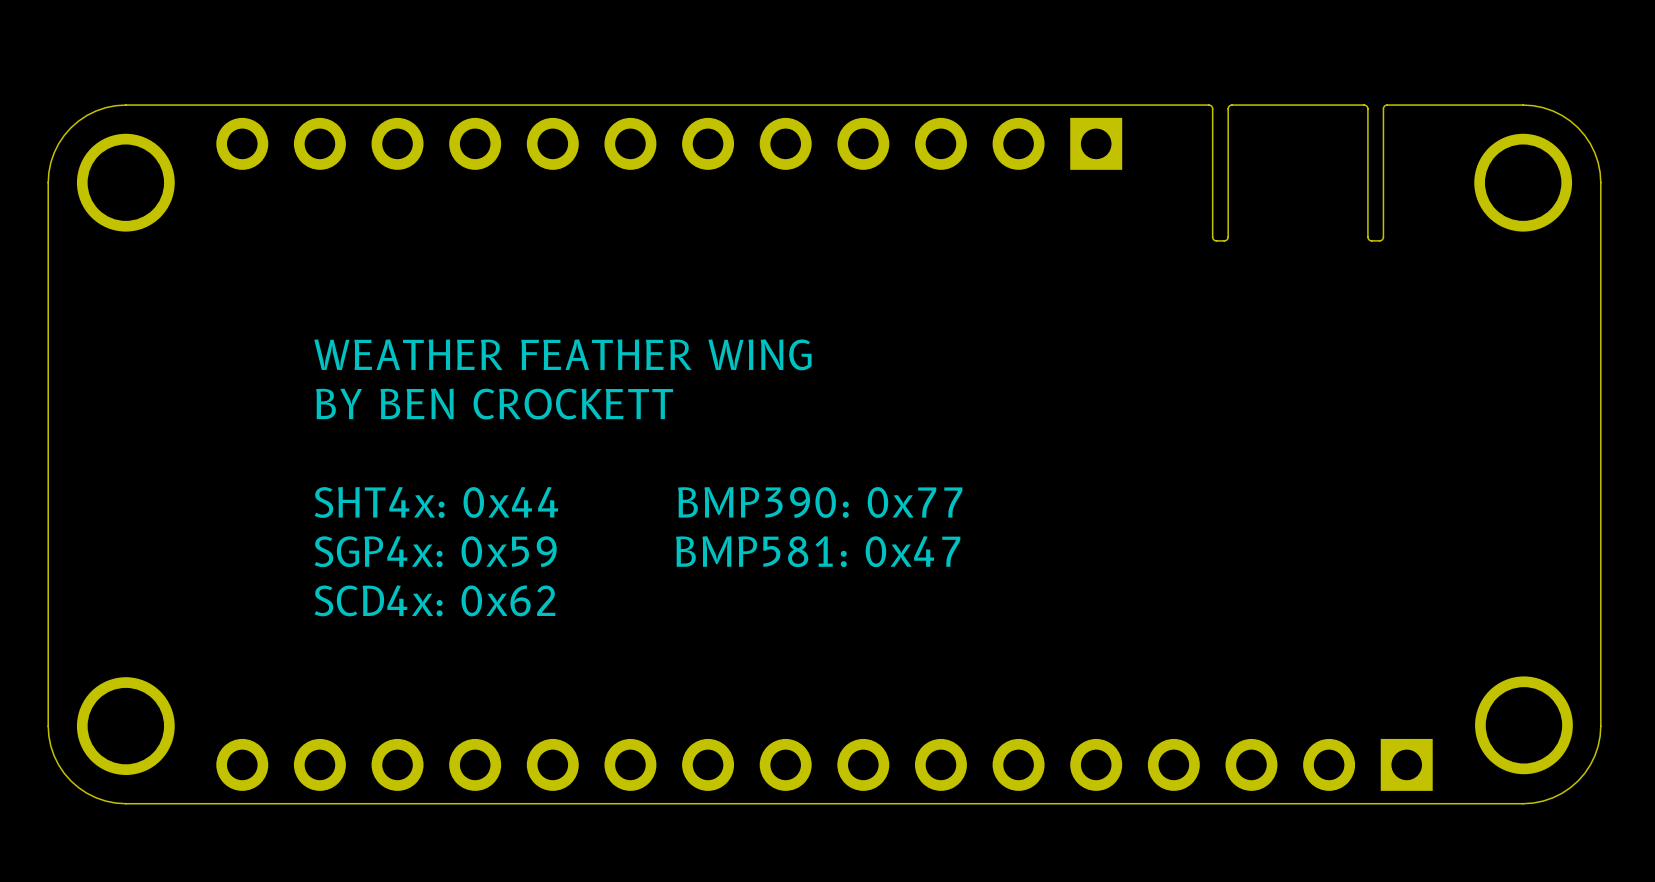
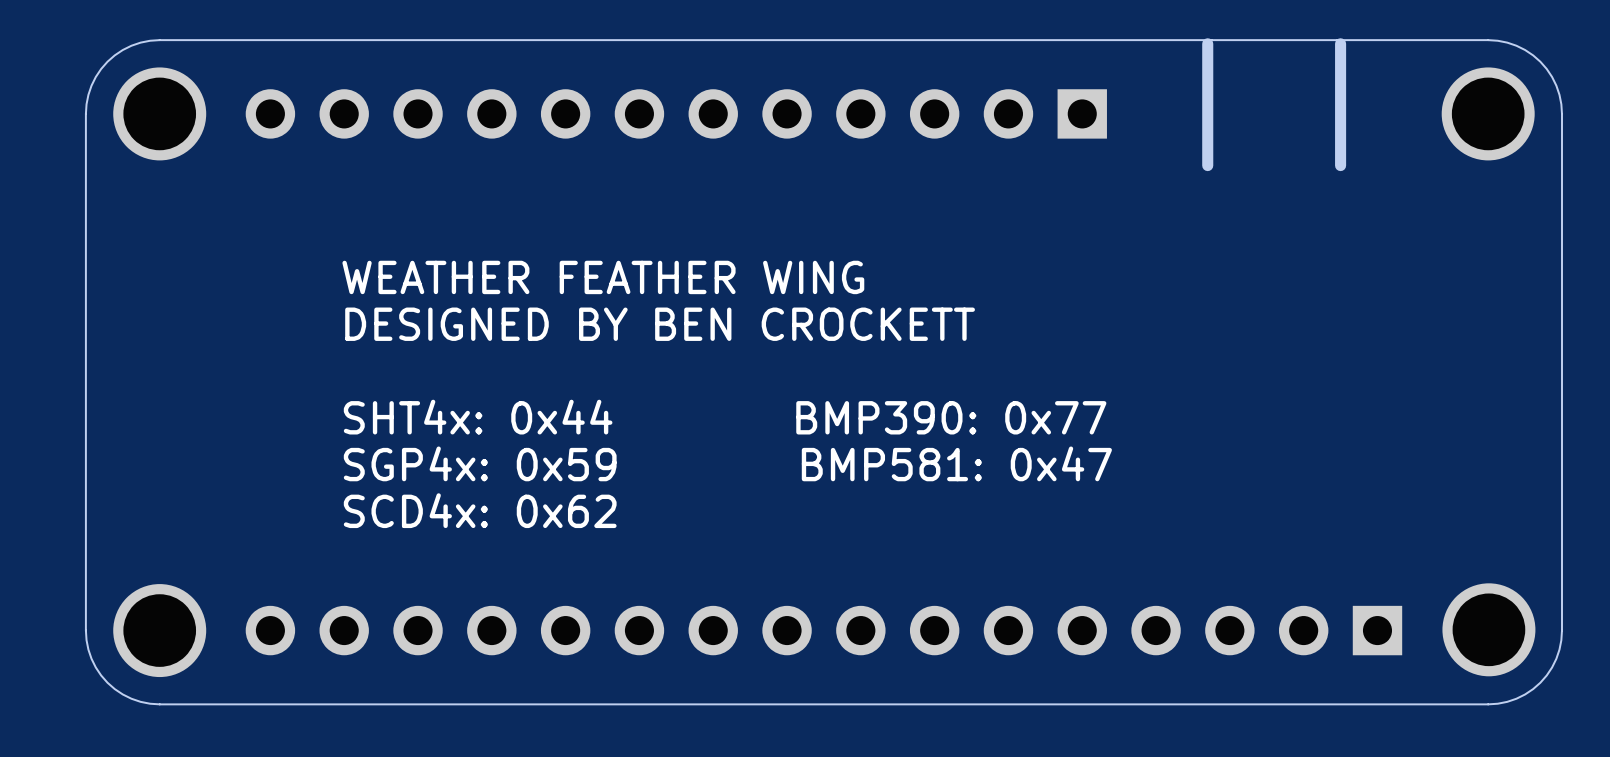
board edge: (1208, 105) (1212, 108) (1212, 237) (1215, 240) (1224, 240) (1228, 237) -> (1189, 40) (1211, 40)
board edge: (1387, 105) (1383, 108) (1383, 237) (1380, 240) (1371, 240) (1367, 237) -> (1359, 40) (1336, 40)
board edge width: thin (1228, 108) (1228, 237) -> thick (1207, 43) (1207, 165)
board edge width: thin (1367, 108) (1367, 237) -> thick (1340, 43) (1340, 165)
part position: (669, 143) -> (676, 113)
text: BY BEN CROCKETT (494, 404) -> DESIGNED BY BEN CROCKETT (660, 324)
part position: (824, 764) -> (823, 630)

